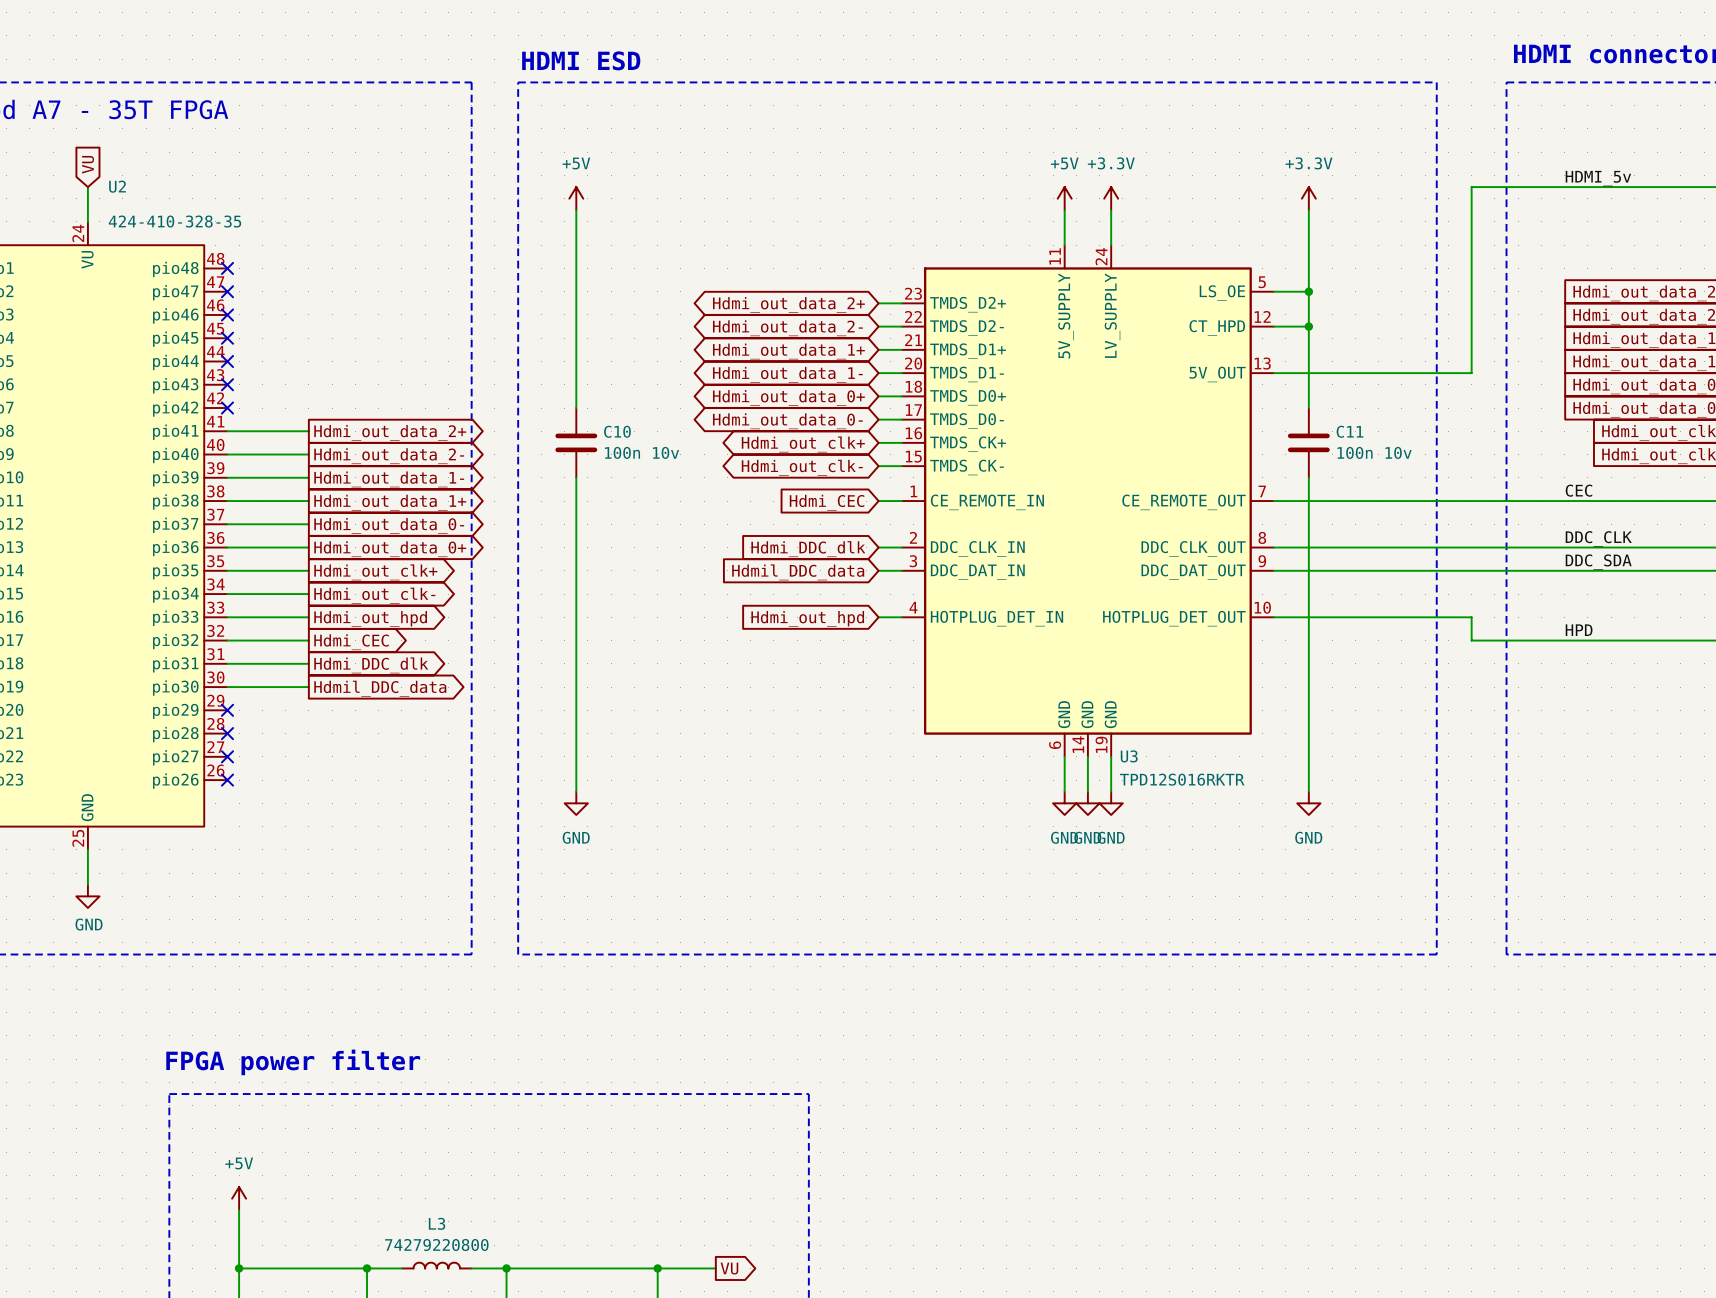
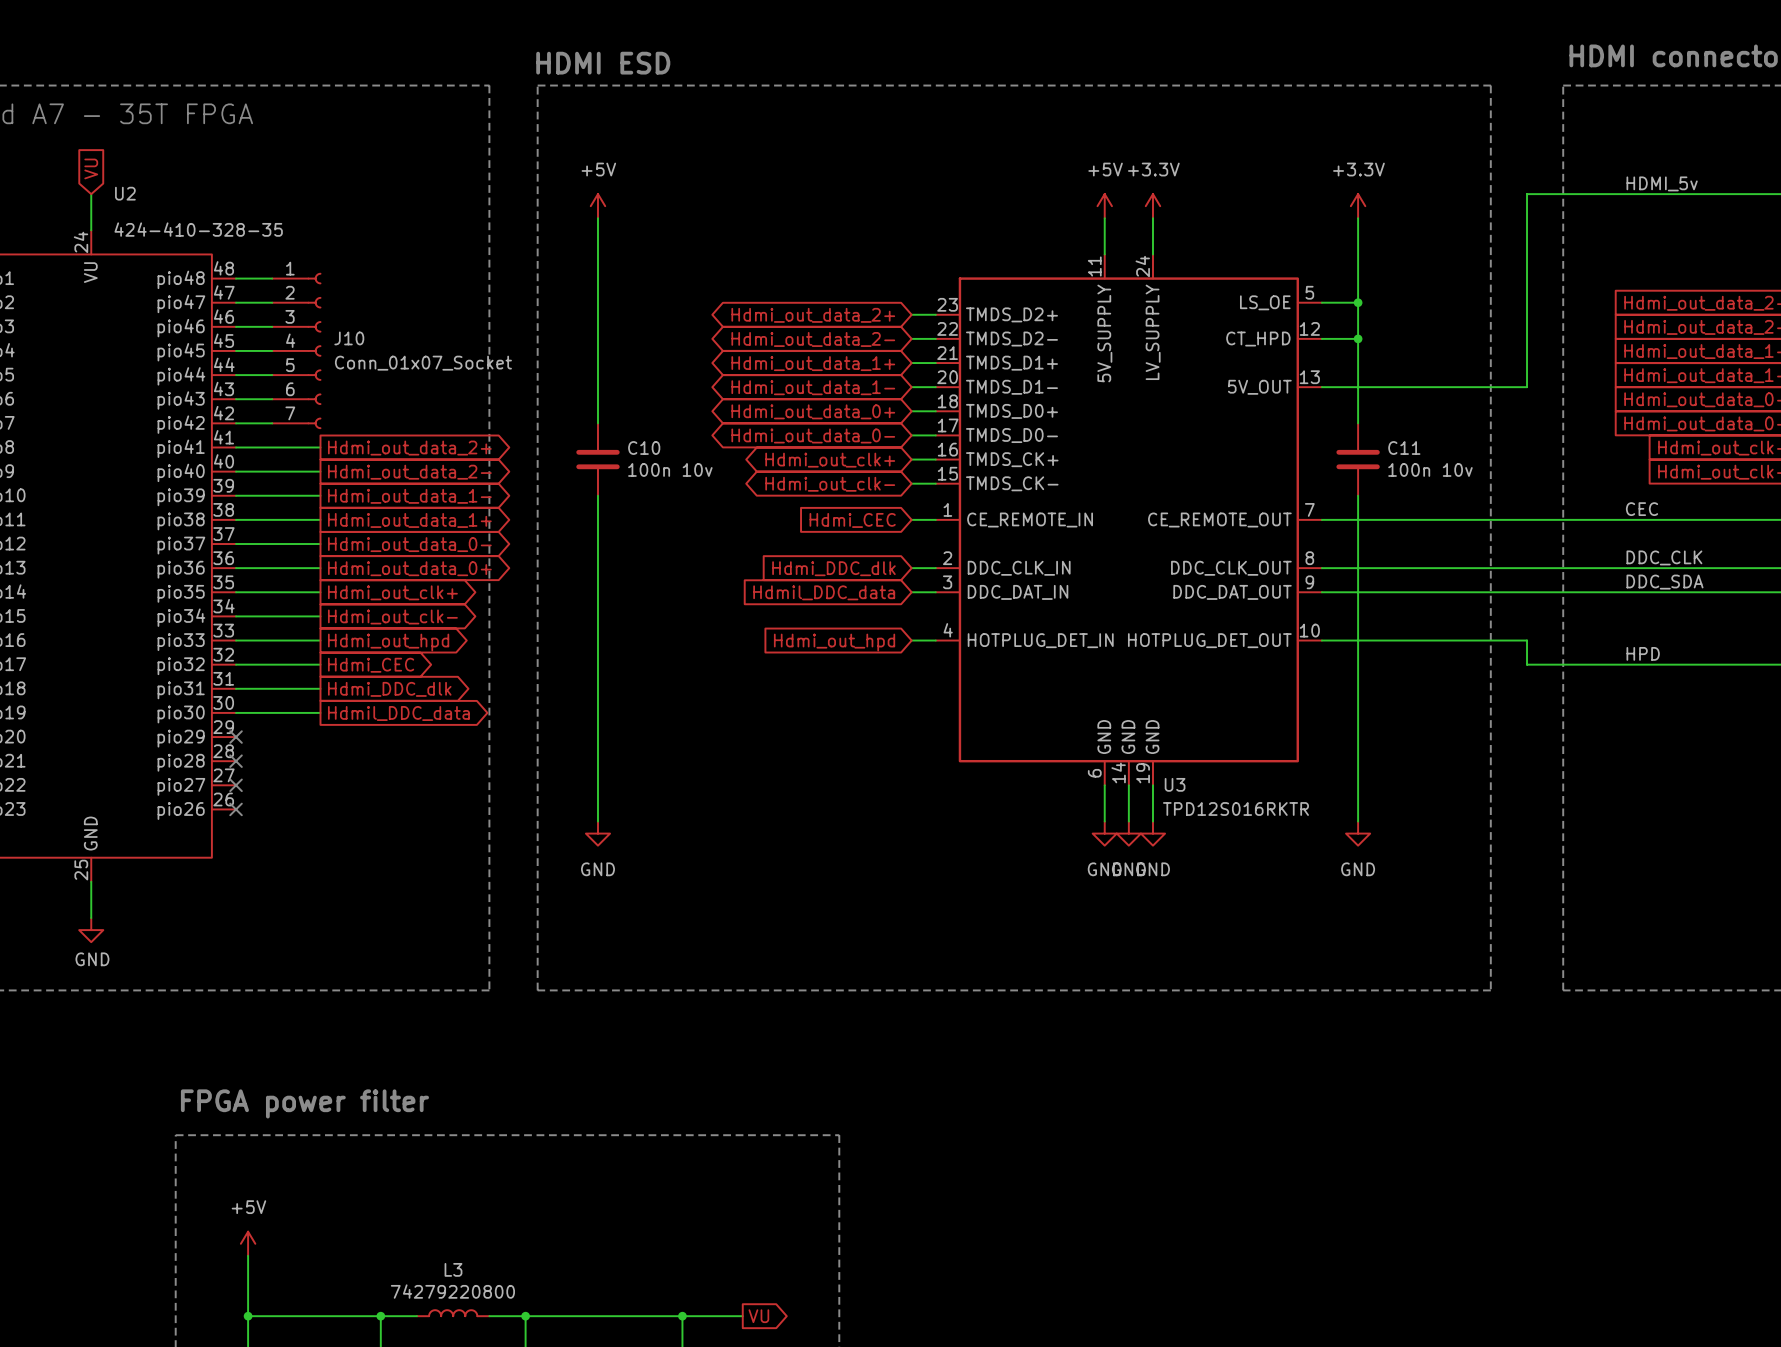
wire: none -> (236, 278) (272, 278)
no-connect mark: (227, 268) -> none
wire: none -> (236, 302) (272, 302)
no-connect mark: (227, 291) -> none
wire: none -> (236, 326) (272, 326)
no-connect mark: (227, 314) -> none
wire: none -> (236, 350) (272, 350)
no-connect mark: (227, 338) -> none
J10: none -> Conn_01x07_Socket (296, 350)
wire: none -> (236, 375) (272, 375)
no-connect mark: (227, 361) -> none
wire: none -> (236, 399) (272, 399)
no-connect mark: (227, 384) -> none
wire: none -> (236, 423) (272, 423)
no-connect mark: (227, 408) -> none

